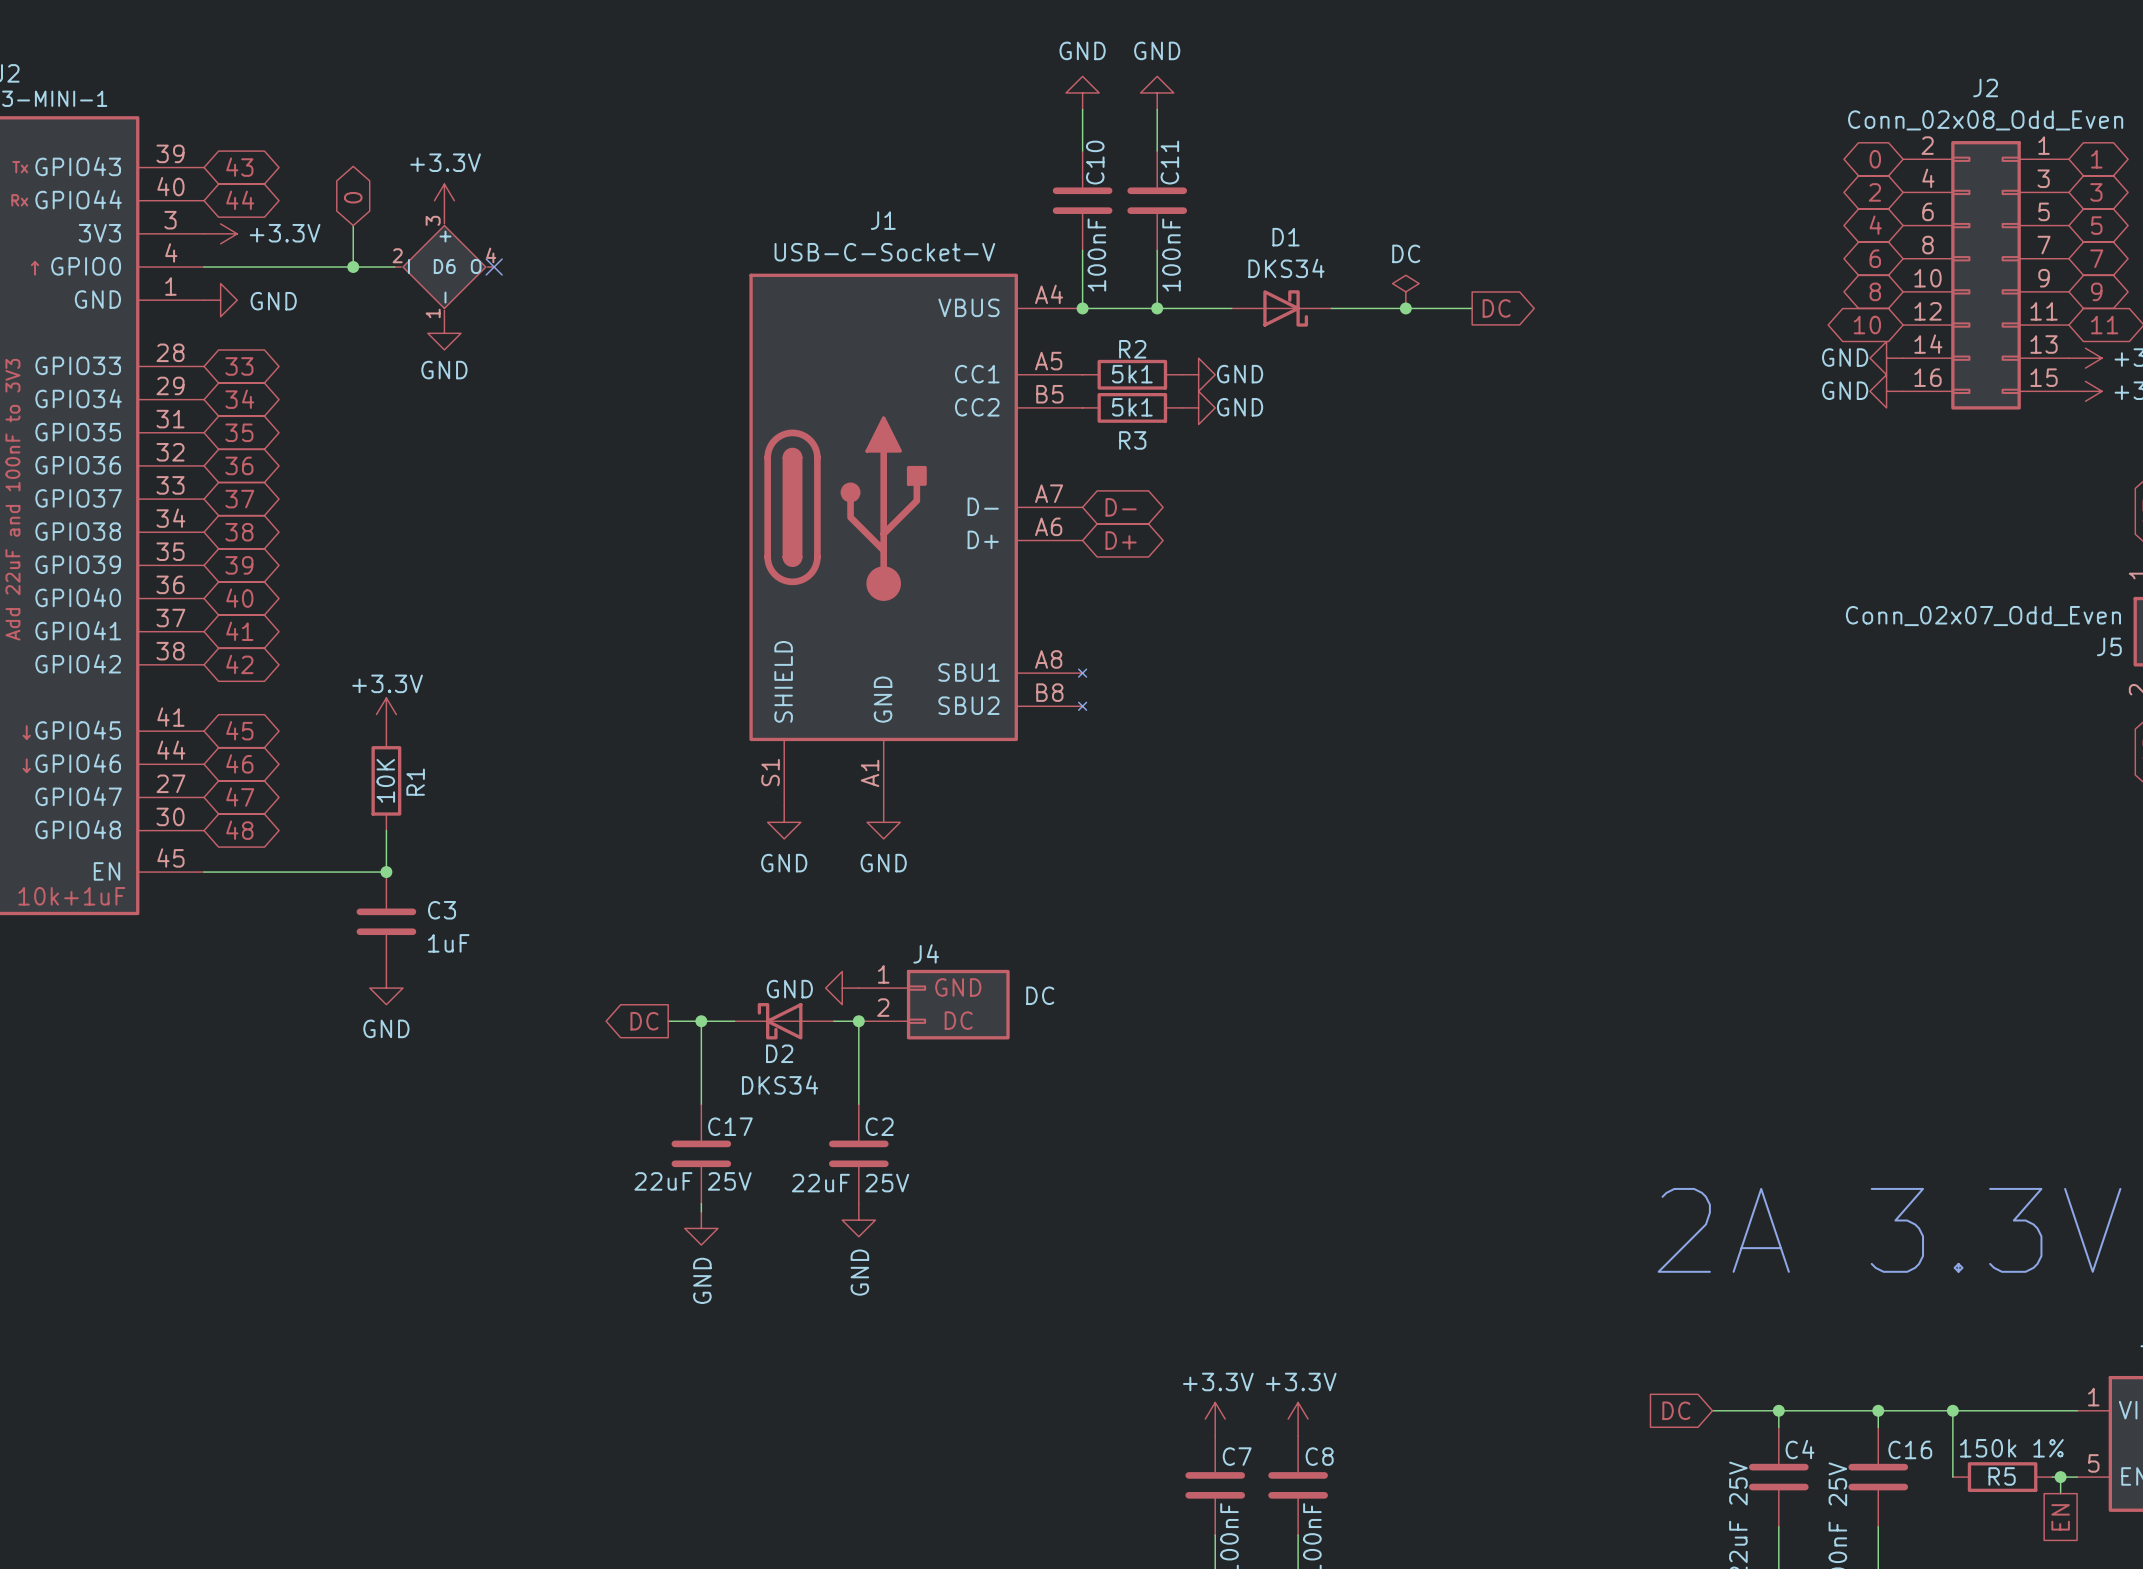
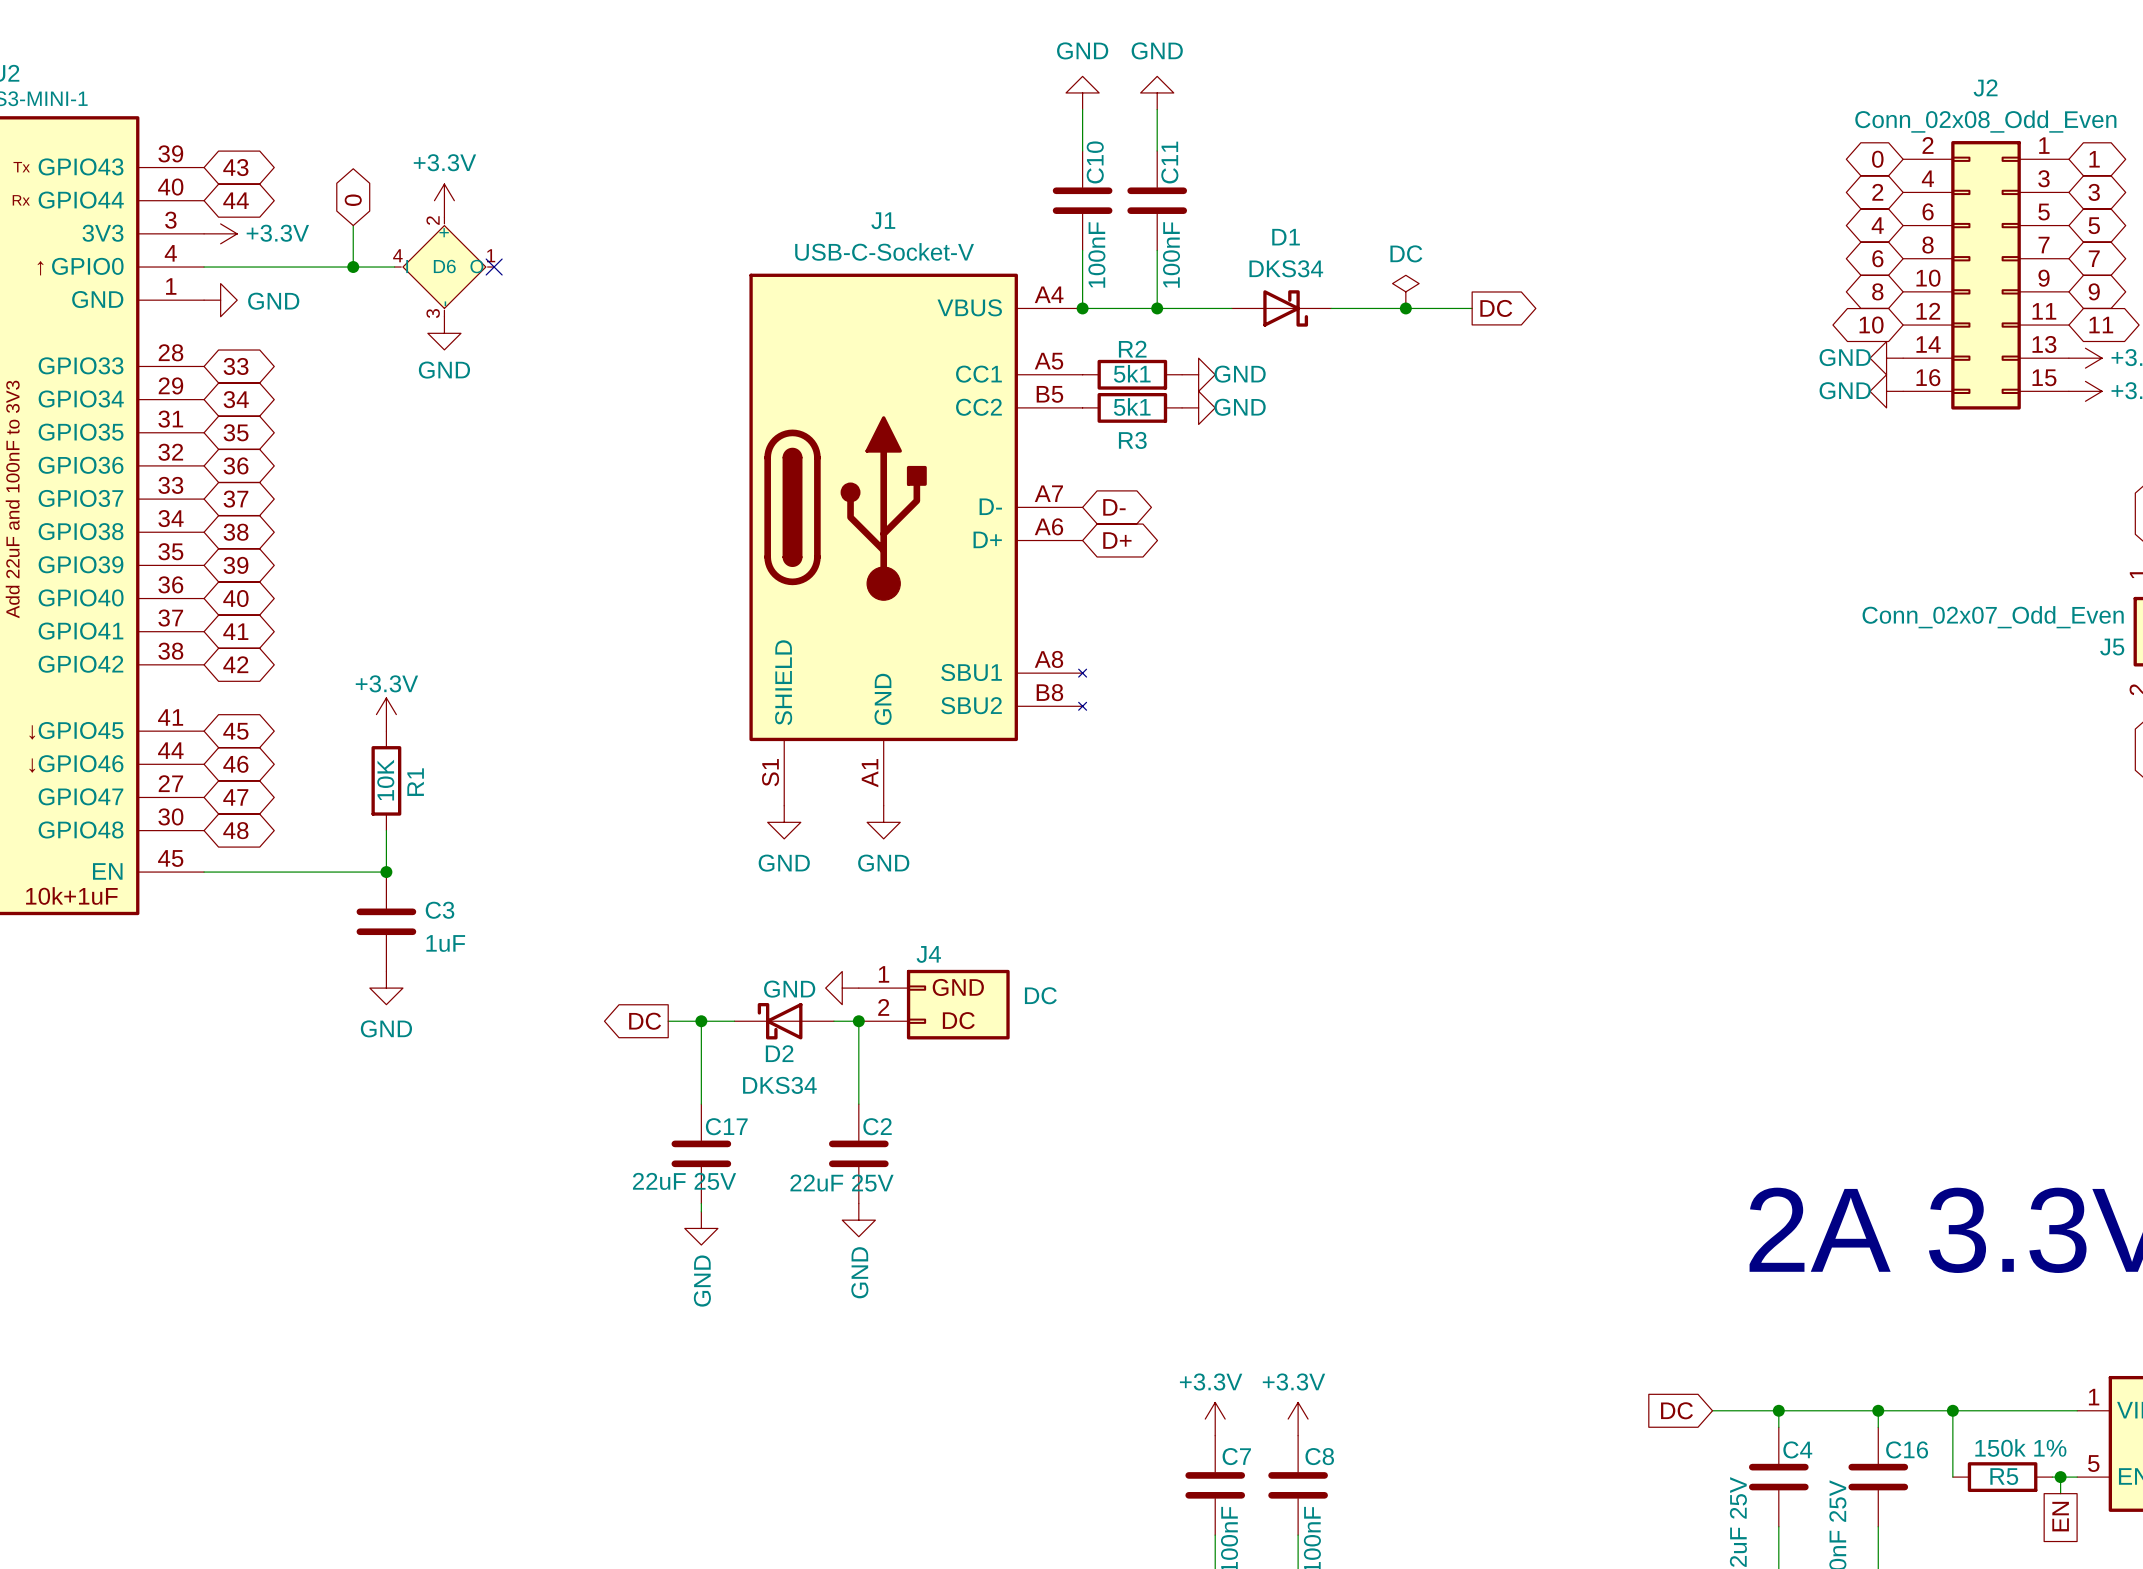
D6 pin number: 3 (433, 220) -> 2 (433, 220)
D6 pin number: 2 (397, 255) -> 4 (397, 255)
D6 pin number: 4 (491, 255) -> 1 (491, 255)
D6 pin number: 1 (433, 313) -> 3 (433, 313)

